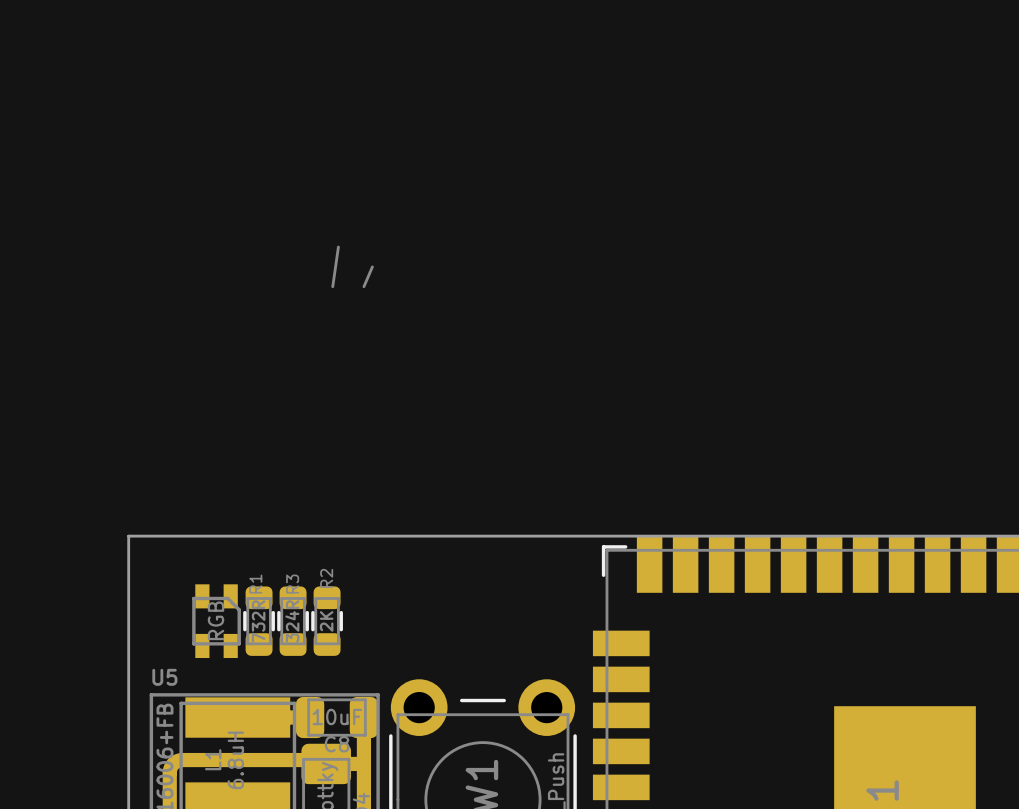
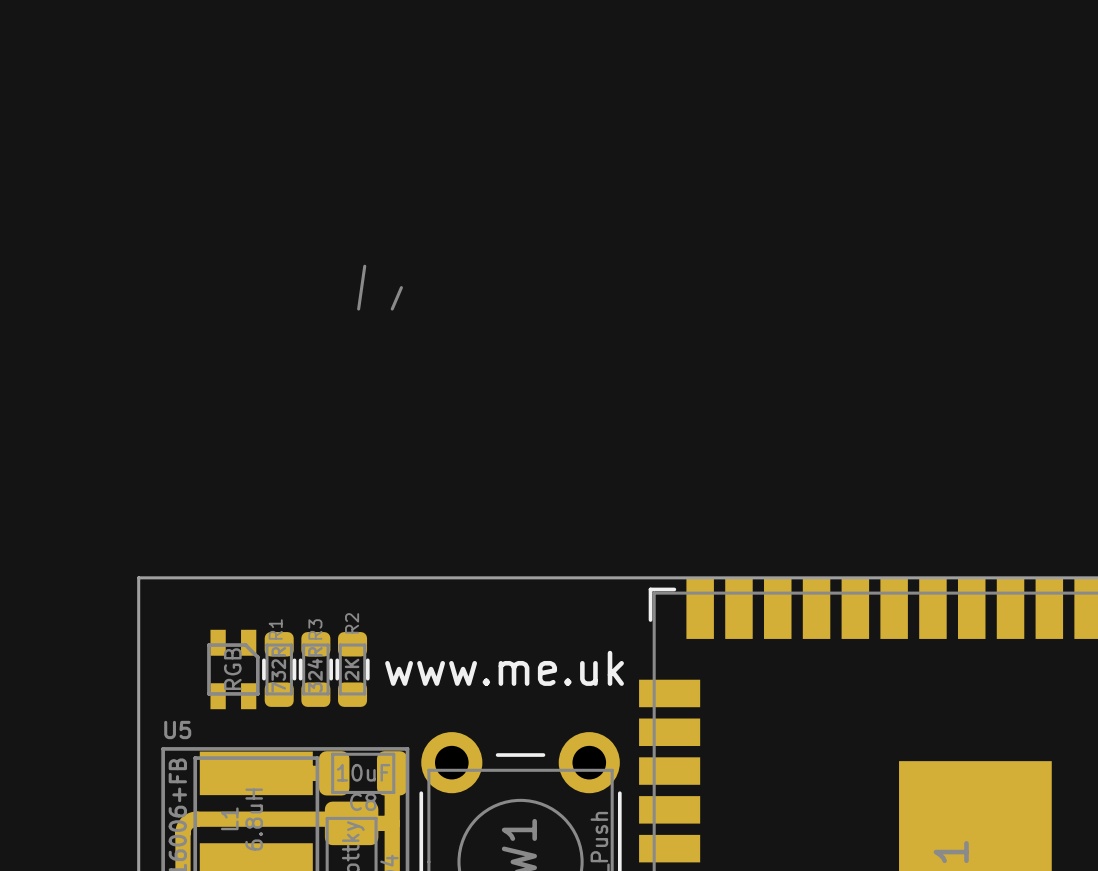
text: none -> www.me.uk (504, 668)

